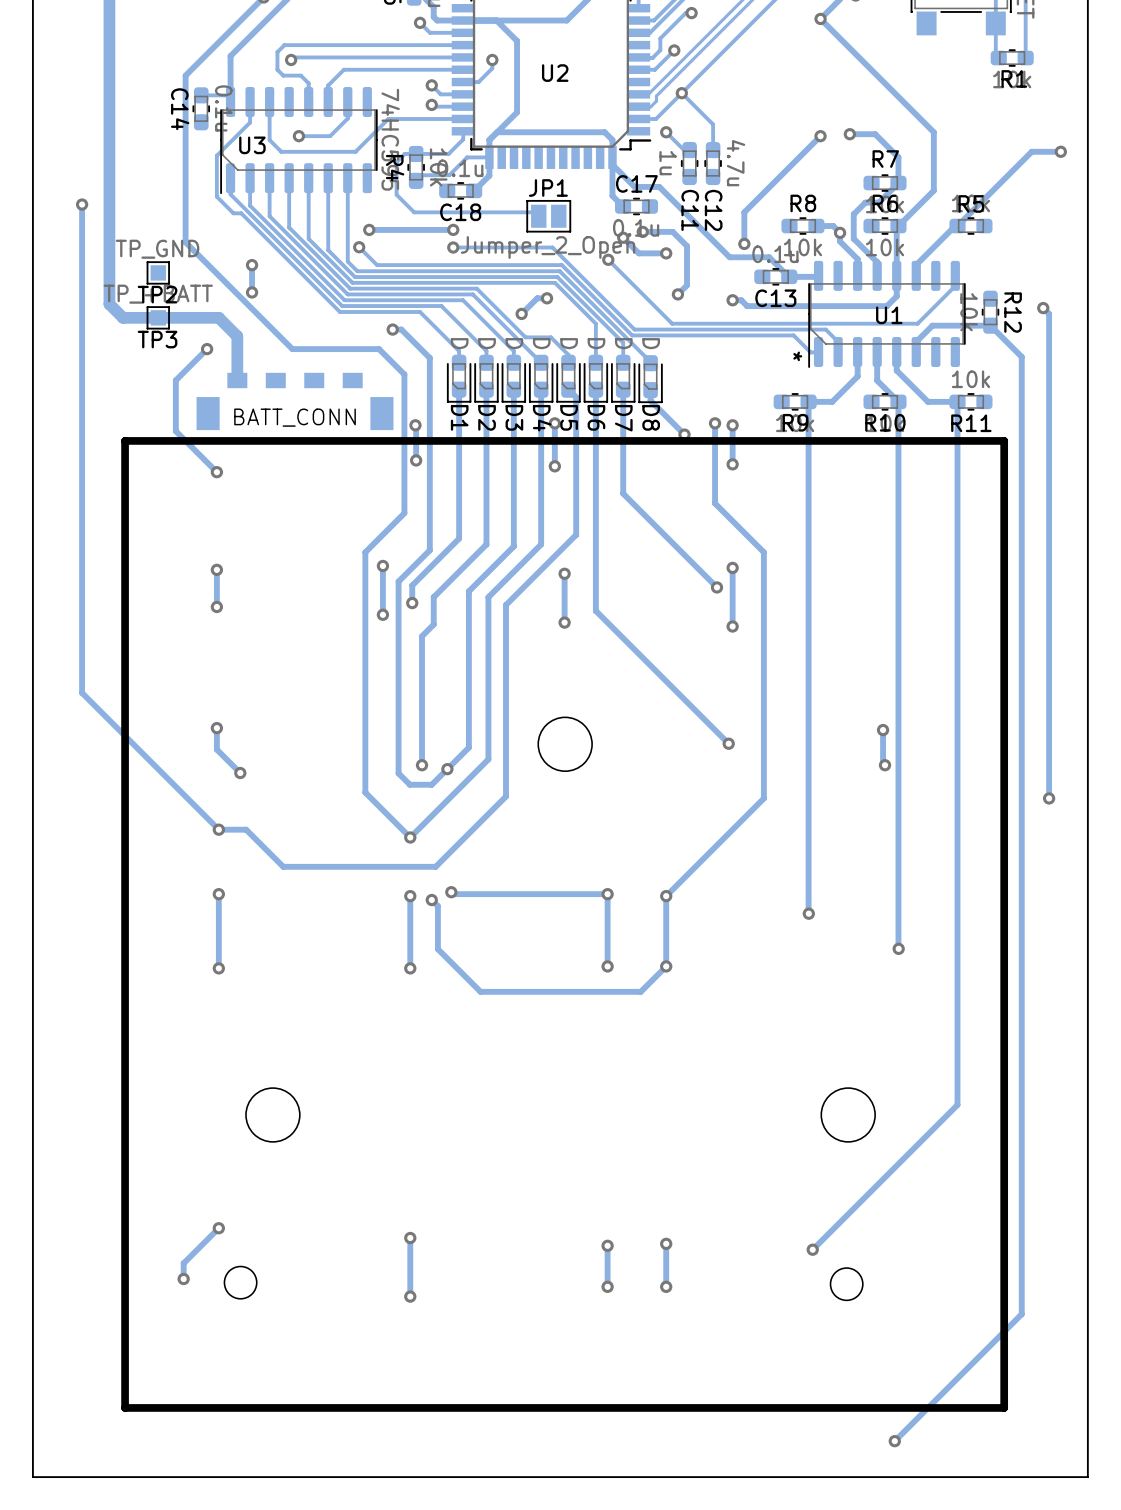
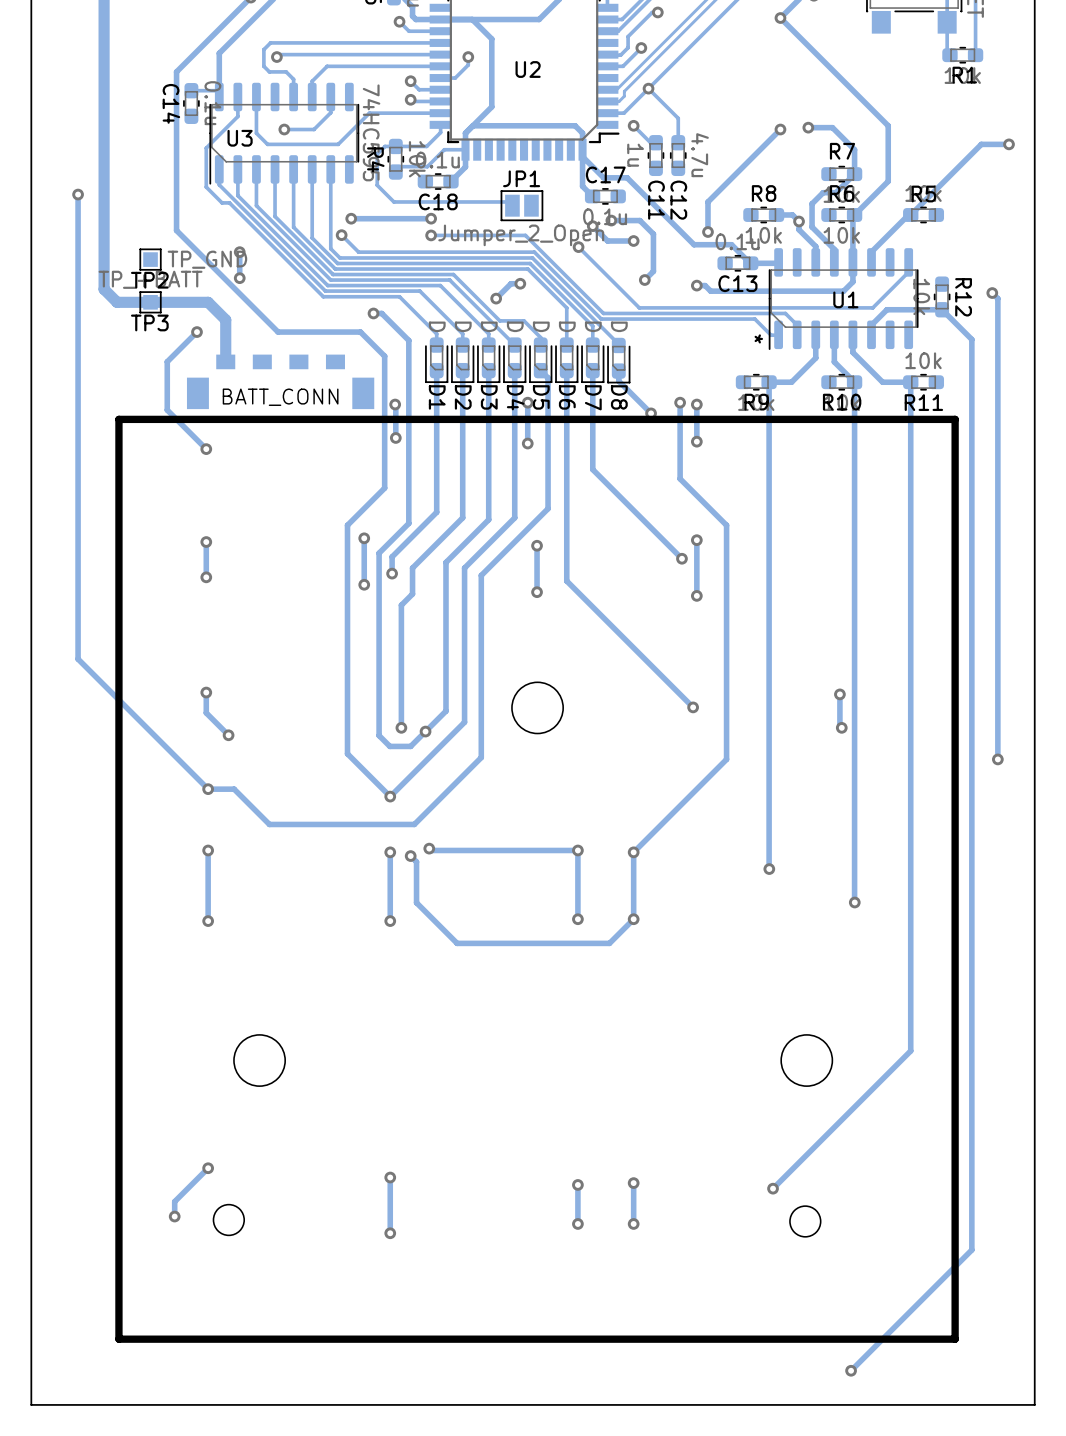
TP2 value position: TP_GND (157, 249) -> TP_GND (207, 259)

